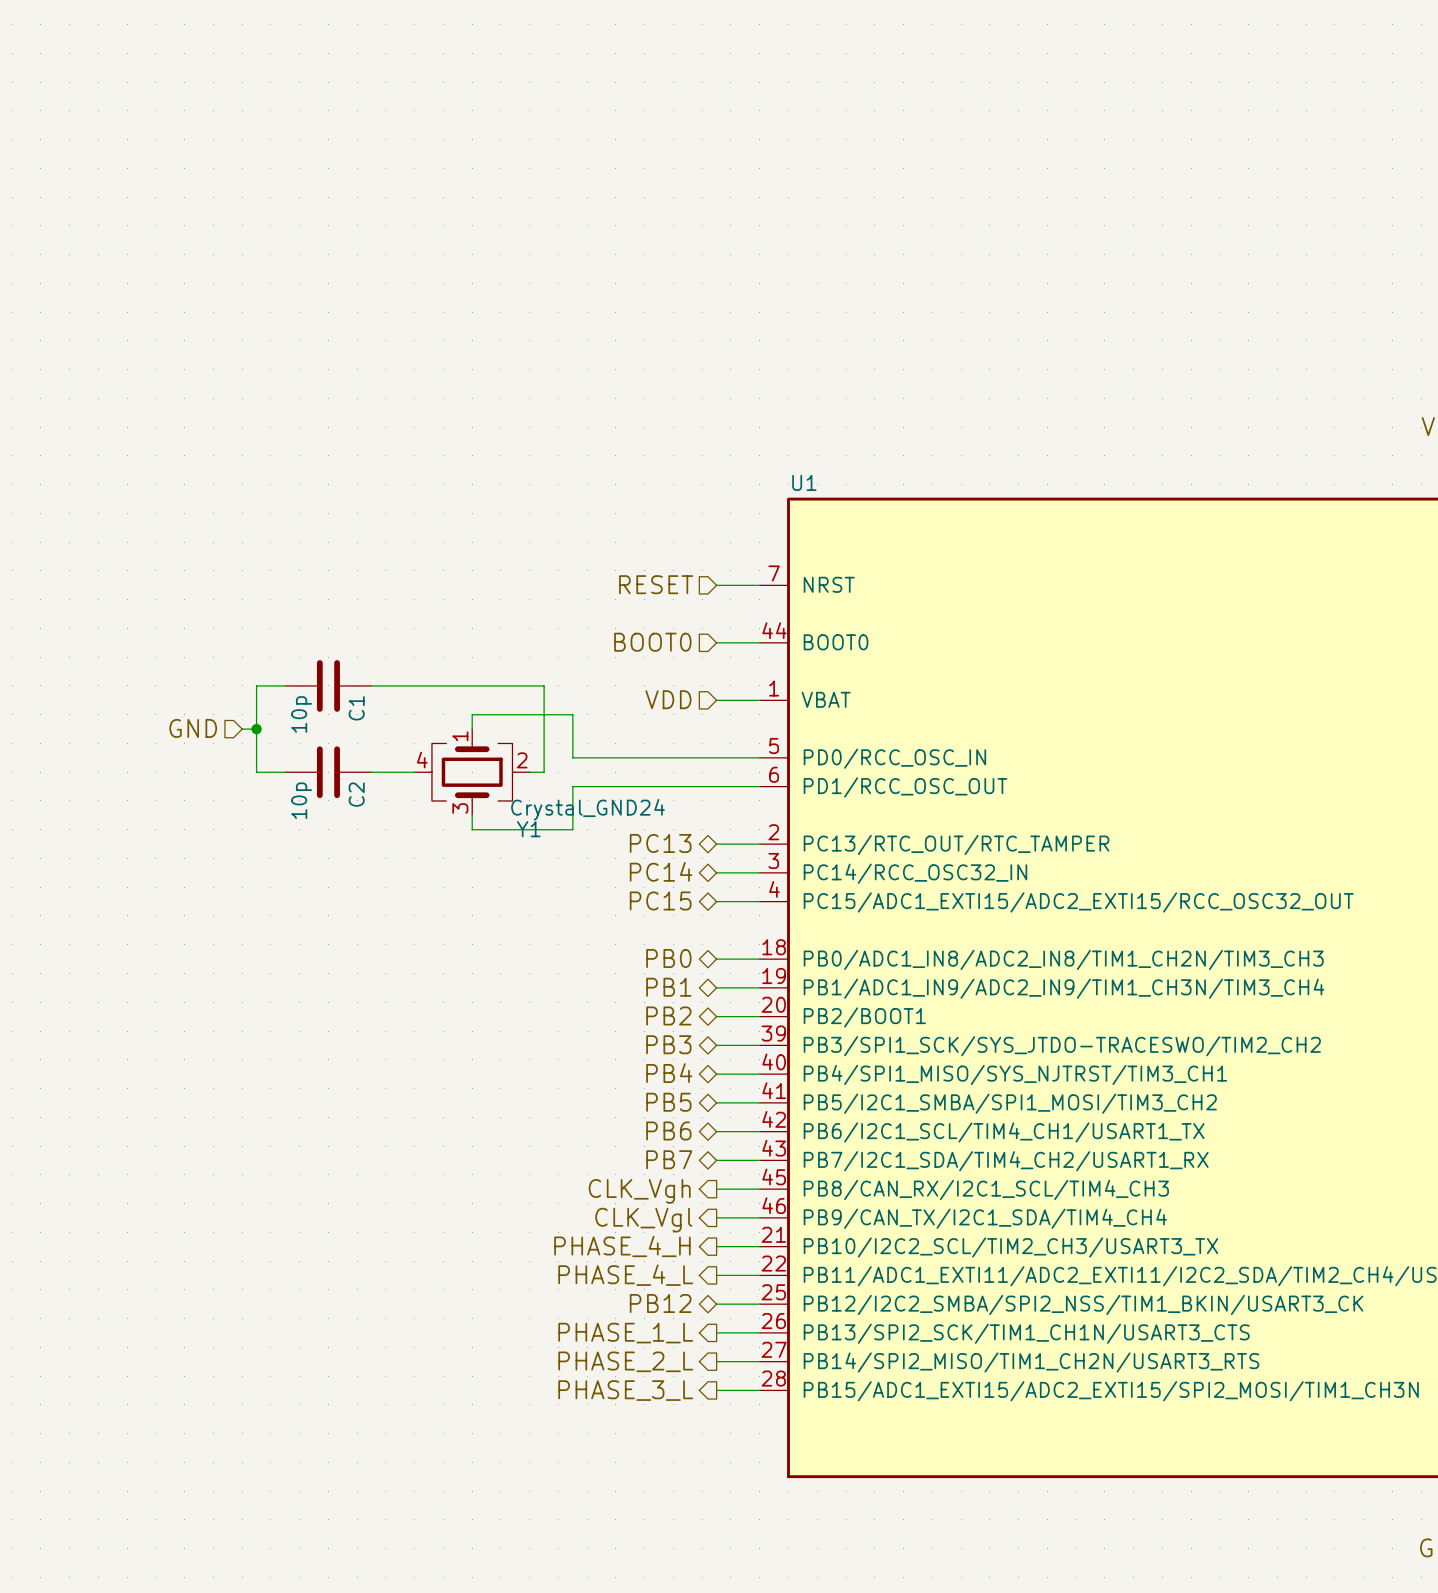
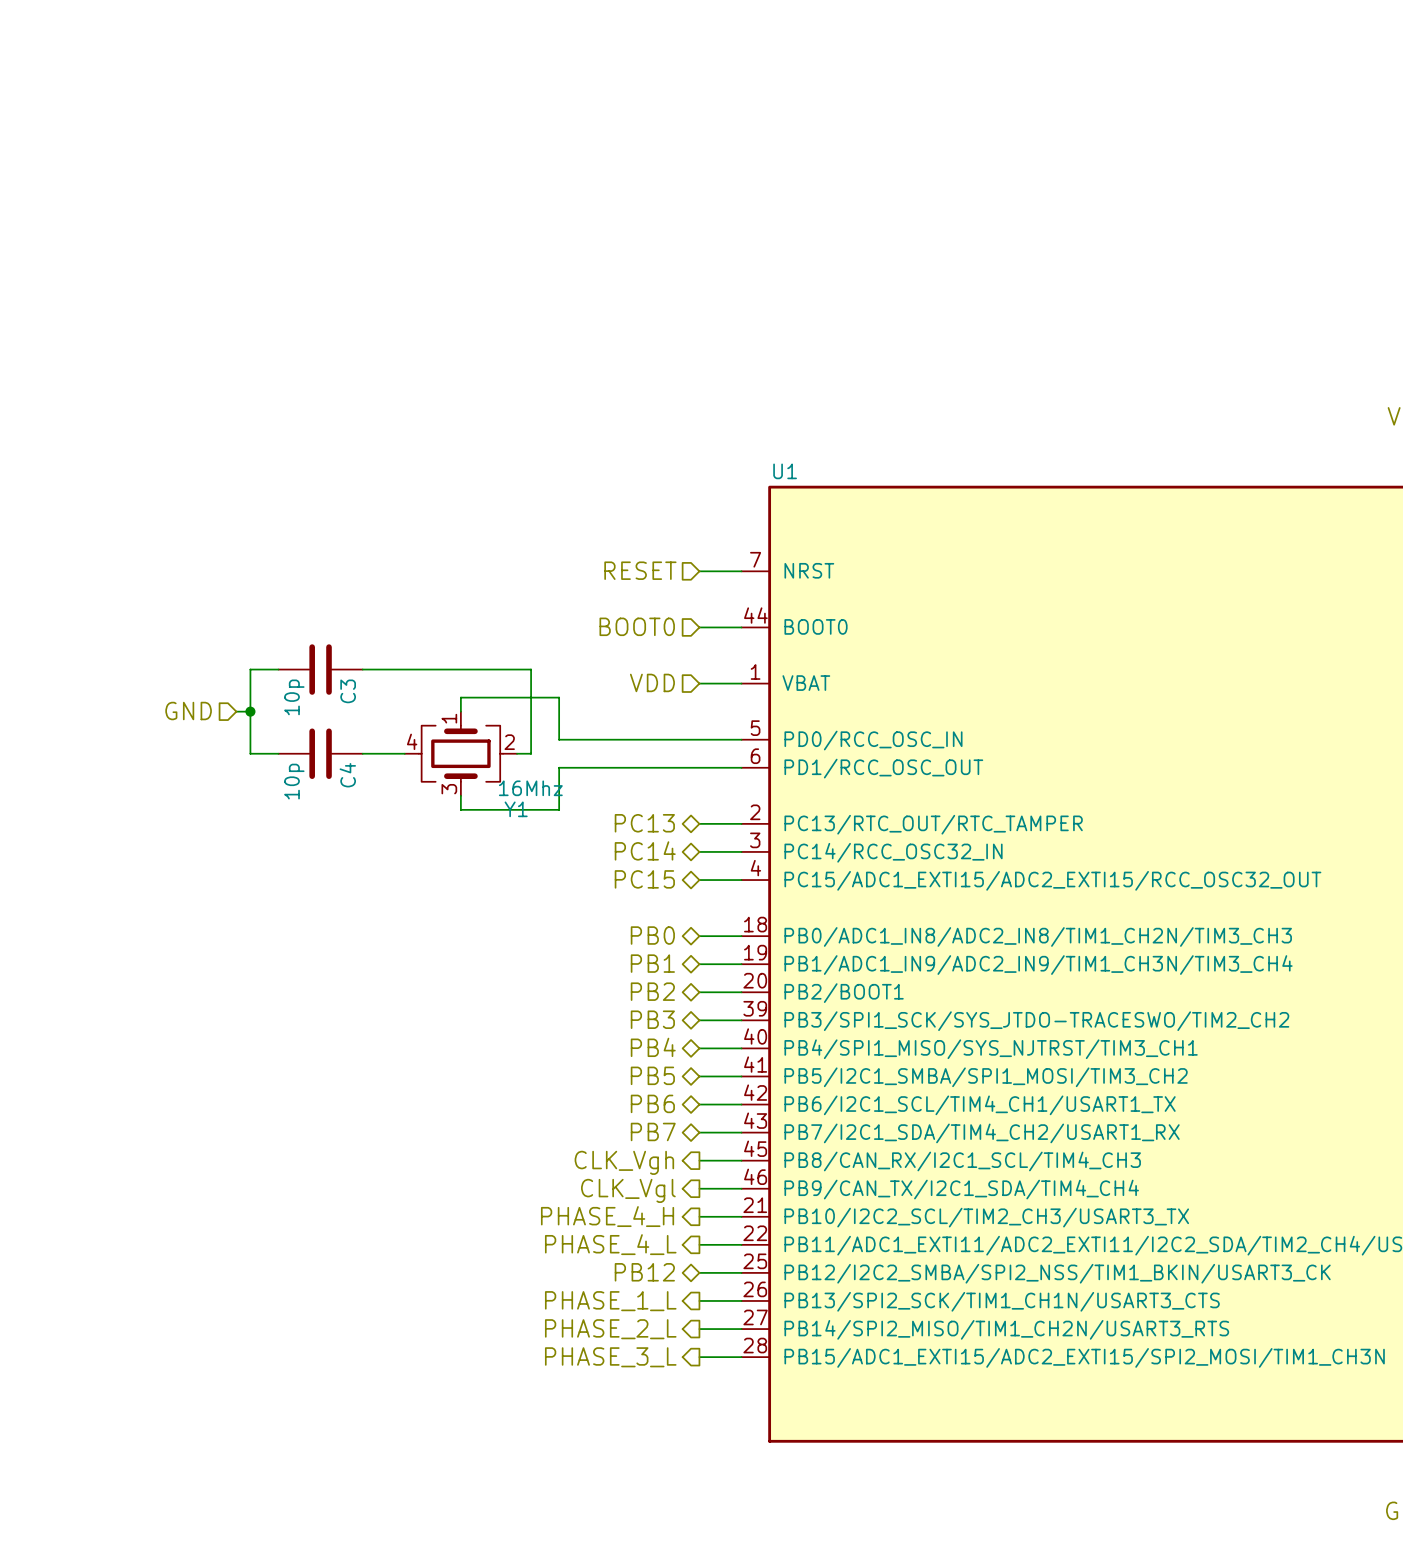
C1 name: C1 (356, 708) -> C3 (348, 691)
C2 name: C2 (356, 794) -> C4 (347, 775)
Y1 value: Crystal_GND24 (588, 809) -> 16Mhz (530, 788)

